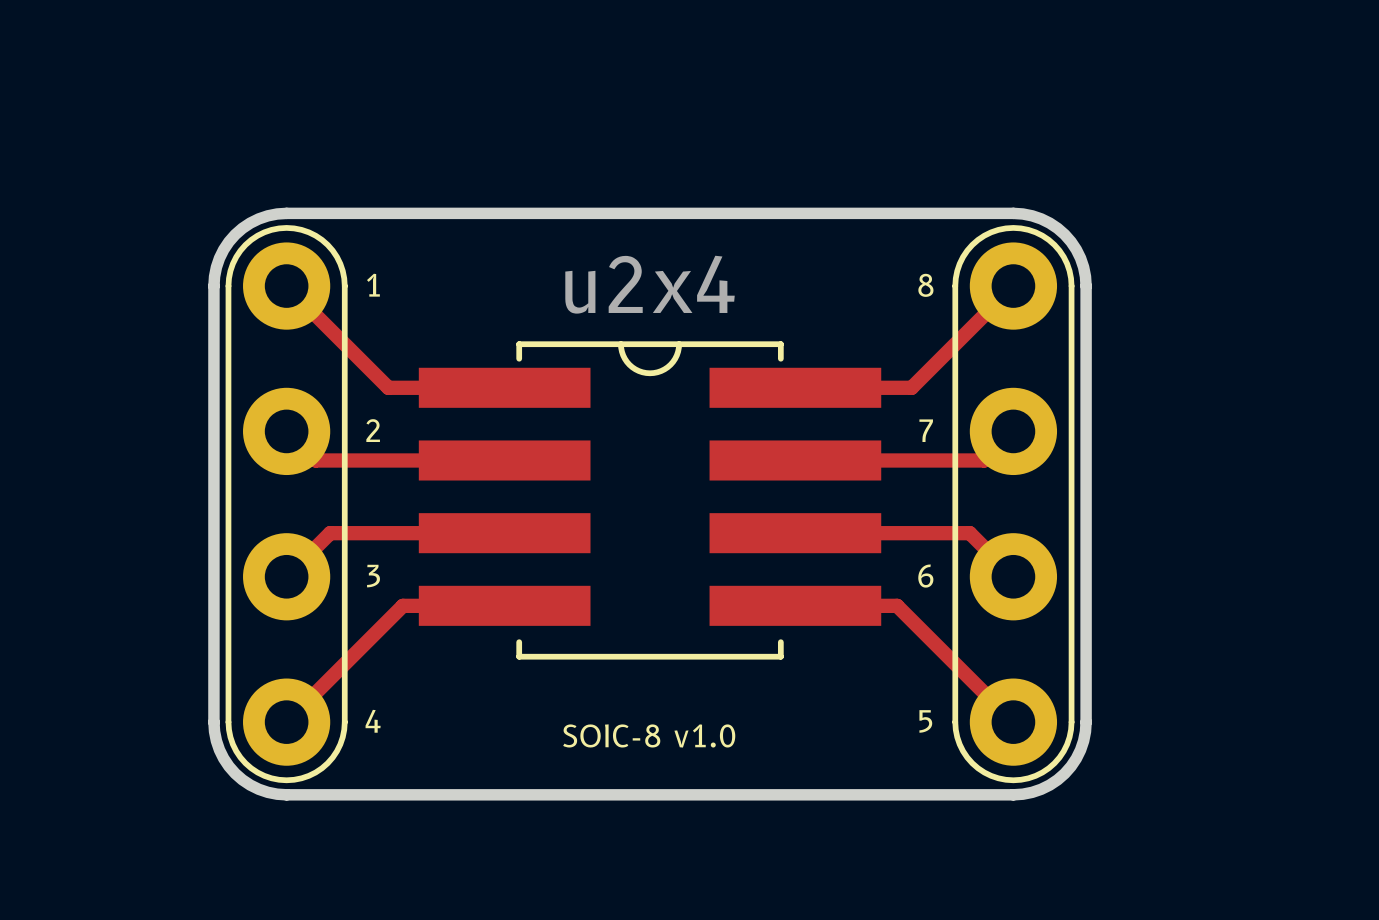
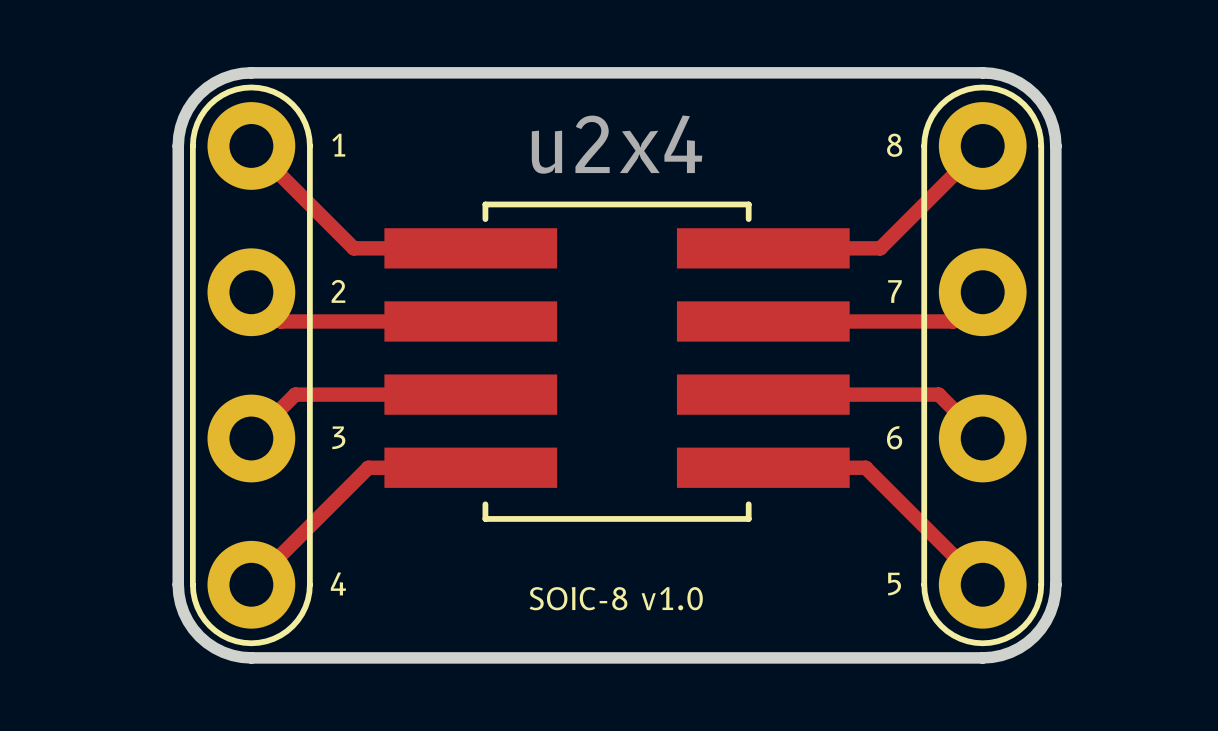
part footprint: [418, 341, 882, 660] -> [384, 201, 850, 522]

